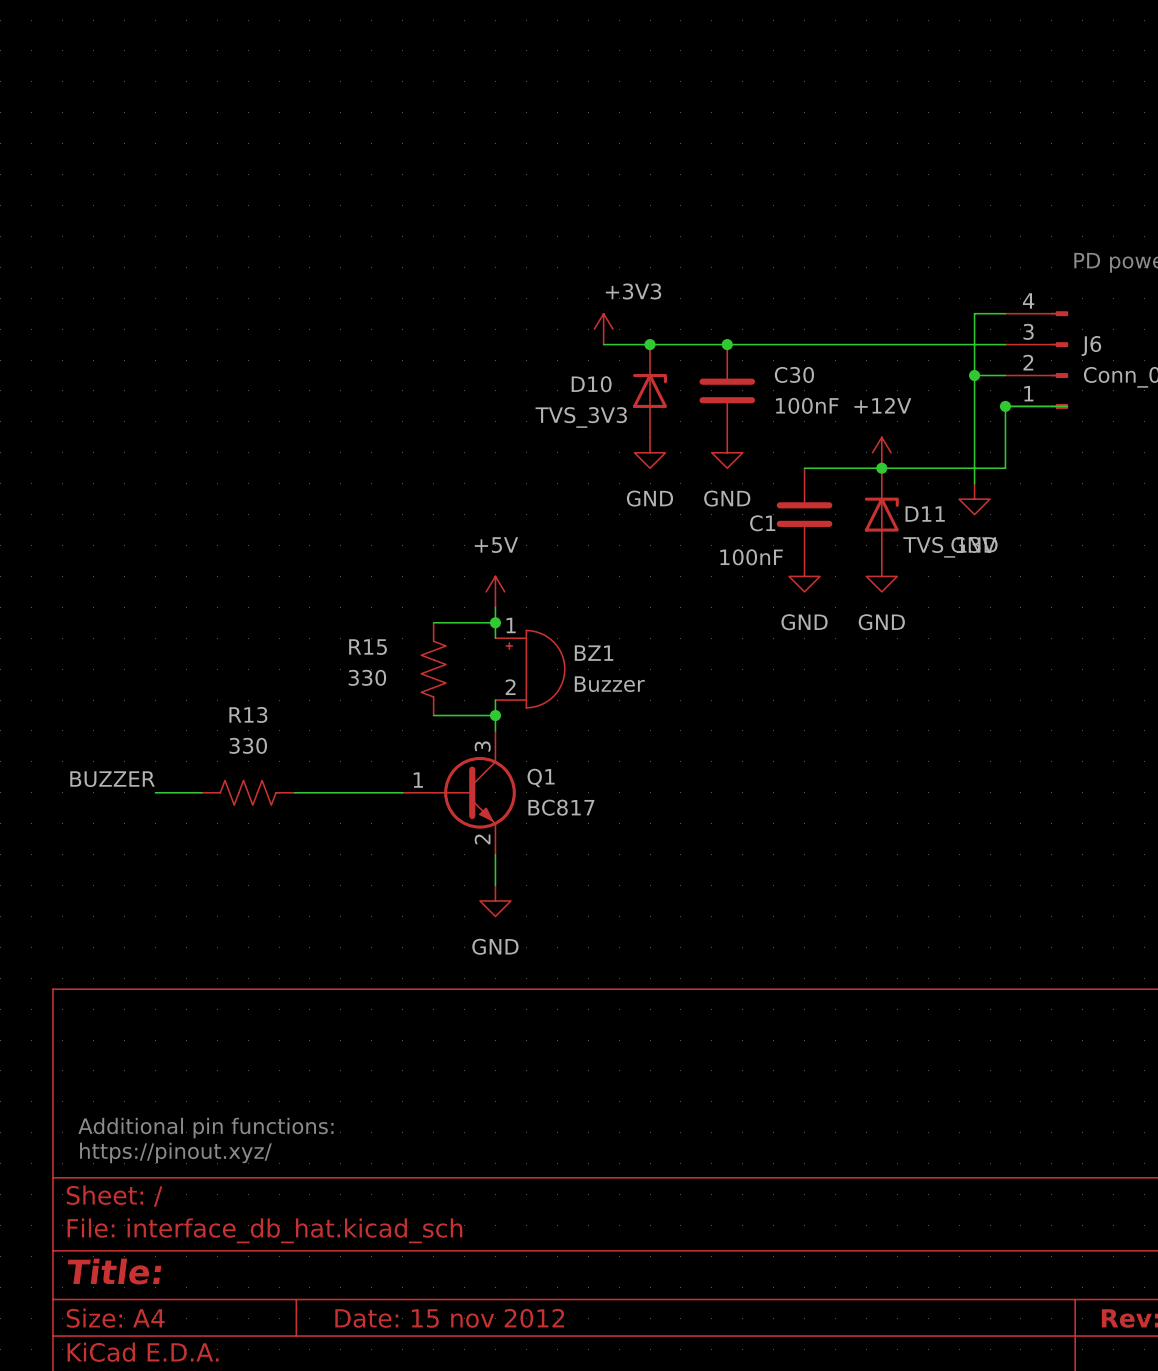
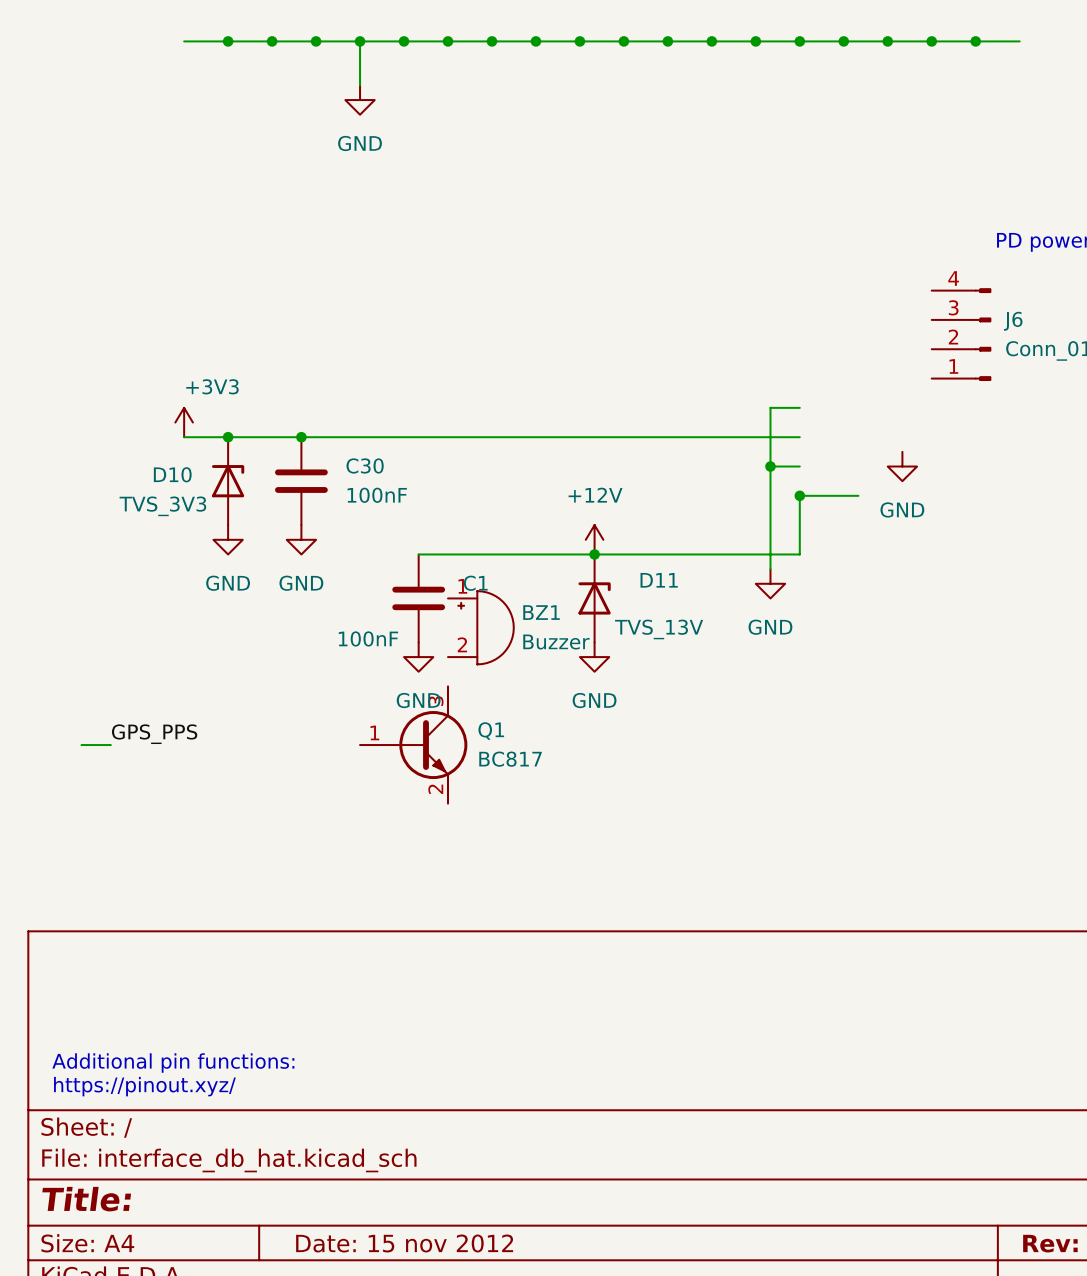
wire: none -> (184, 41) (1019, 41)
junction: none -> (228, 41)
junction: none -> (272, 41)
junction: none -> (316, 41)
wire: none -> (360, 41) (360, 85)
junction: none -> (360, 41)
junction: none -> (404, 41)
junction: none -> (447, 41)
junction: none -> (491, 41)
junction: none -> (535, 41)
junction: none -> (579, 41)
junction: none -> (623, 41)
junction: none -> (667, 41)
junction: none -> (711, 41)
junction: none -> (755, 41)
junction: none -> (799, 41)
junction: none -> (843, 41)
junction: none -> (887, 41)
junction: none -> (931, 41)
junction: none -> (975, 41)
power symbol: none -> GND (360, 100)
wire: (1005, 313) (974, 313) (974, 483) -> (799, 407) (770, 407) (770, 569)
power symbol: +3V3 (603, 329) -> none
wire: (603, 344) (1005, 344) -> none
junction: (650, 344) -> none
junction: (727, 344) -> none
wire: (974, 375) (1005, 375) -> (770, 466) (799, 466)
junction: (974, 375) -> none
D10 position: (650, 390) -> (228, 481)
C30 position: (727, 390) -> (301, 481)
junction: (1005, 406) -> none
wire: (1067, 406) (1005, 406) (1005, 468) (866, 468) -> none
power symbol: none -> +3V3 (184, 422)
power symbol: GND (650, 452) -> none
power symbol: GND (727, 452) -> none
power symbol position: +12V (881, 452) -> +12V (594, 539)
wire: none -> (184, 437) (741, 437)
junction: none -> (228, 437)
junction: none -> (301, 437)
junction: (881, 468) -> none
junction: none -> (770, 466)
C1 position: (804, 514) -> (418, 598)
D11 position: (881, 514) -> (594, 598)
D11 name position: D11 (925, 514) -> D11 (659, 580)
C1 name position: C1 (762, 523) -> C1 (475, 583)
junction: none -> (799, 495)
wire: none -> (858, 495) (799, 495) (799, 554) (418, 554)
power symbol: none -> GND (228, 539)
power symbol: none -> GND (301, 539)
power symbol: GND (804, 576) -> none
power symbol: GND (881, 576) -> none
power symbol: +5V (495, 591) -> none
junction: none -> (594, 554)
wire: (495, 607) (495, 638) -> none
wire: (433, 622) (495, 622) -> none
junction: (495, 622) -> none
power symbol: none -> GND (770, 583)
R15: 330 (433, 669) -> none
power symbol: none -> GND (418, 657)
wire: (495, 700) (495, 730) -> none
power symbol: none -> GND (594, 657)
wire: (433, 715) (495, 715) -> none
junction: (495, 715) -> none
label: BUZZER (112, 779) -> none
label: none -> GPS_PPS (154, 734)
wire: none -> (81, 745) (110, 745)
wire: (155, 792) (201, 792) -> none
R13: 330 (248, 792) -> none
wire: (294, 792) (402, 792) -> none
wire: (495, 854) (495, 885) -> none
power symbol: GND (495, 900) -> none

